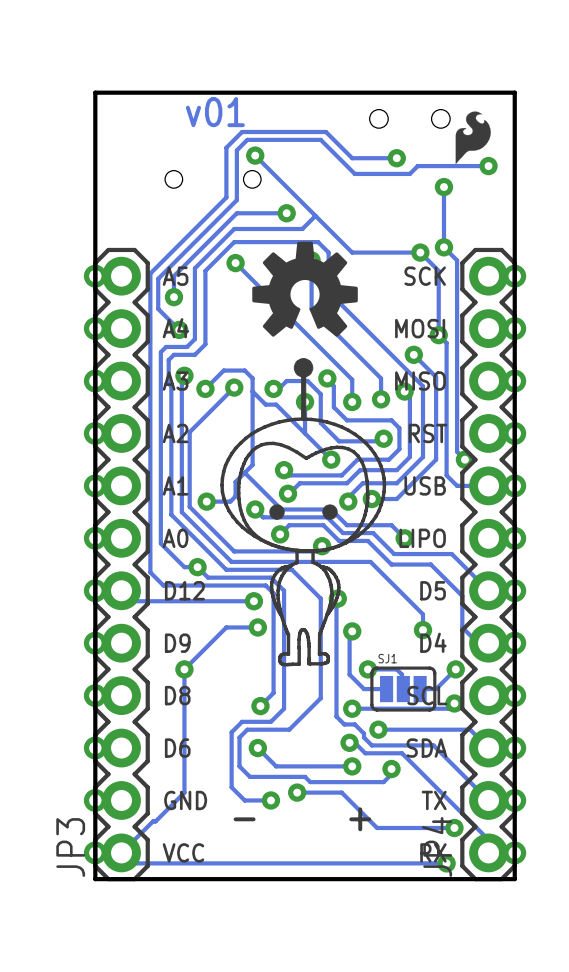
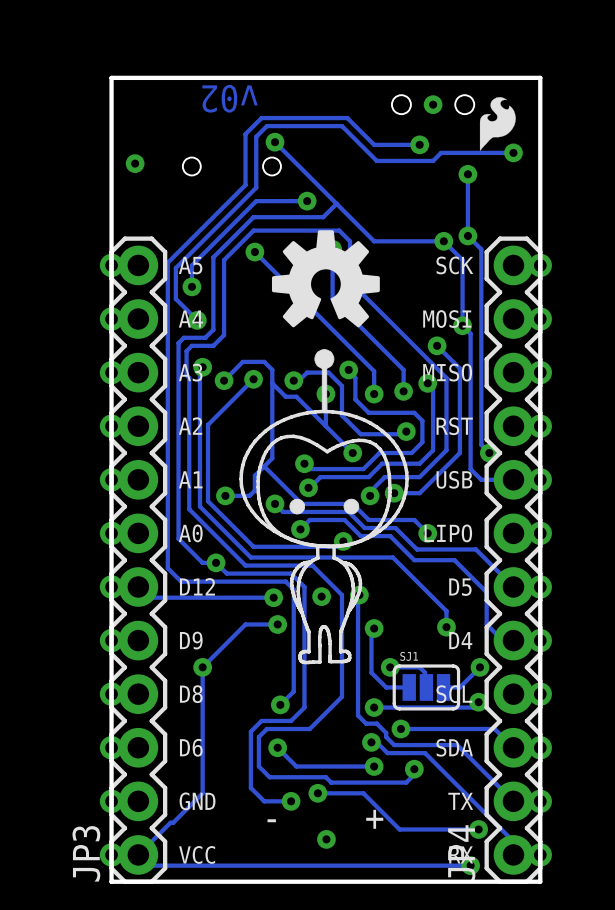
text: v01 (215, 112) -> v02 (230, 98)
via: none -> (433, 104)
via: none -> (135, 163)
via: none -> (321, 596)
via: none -> (326, 839)

